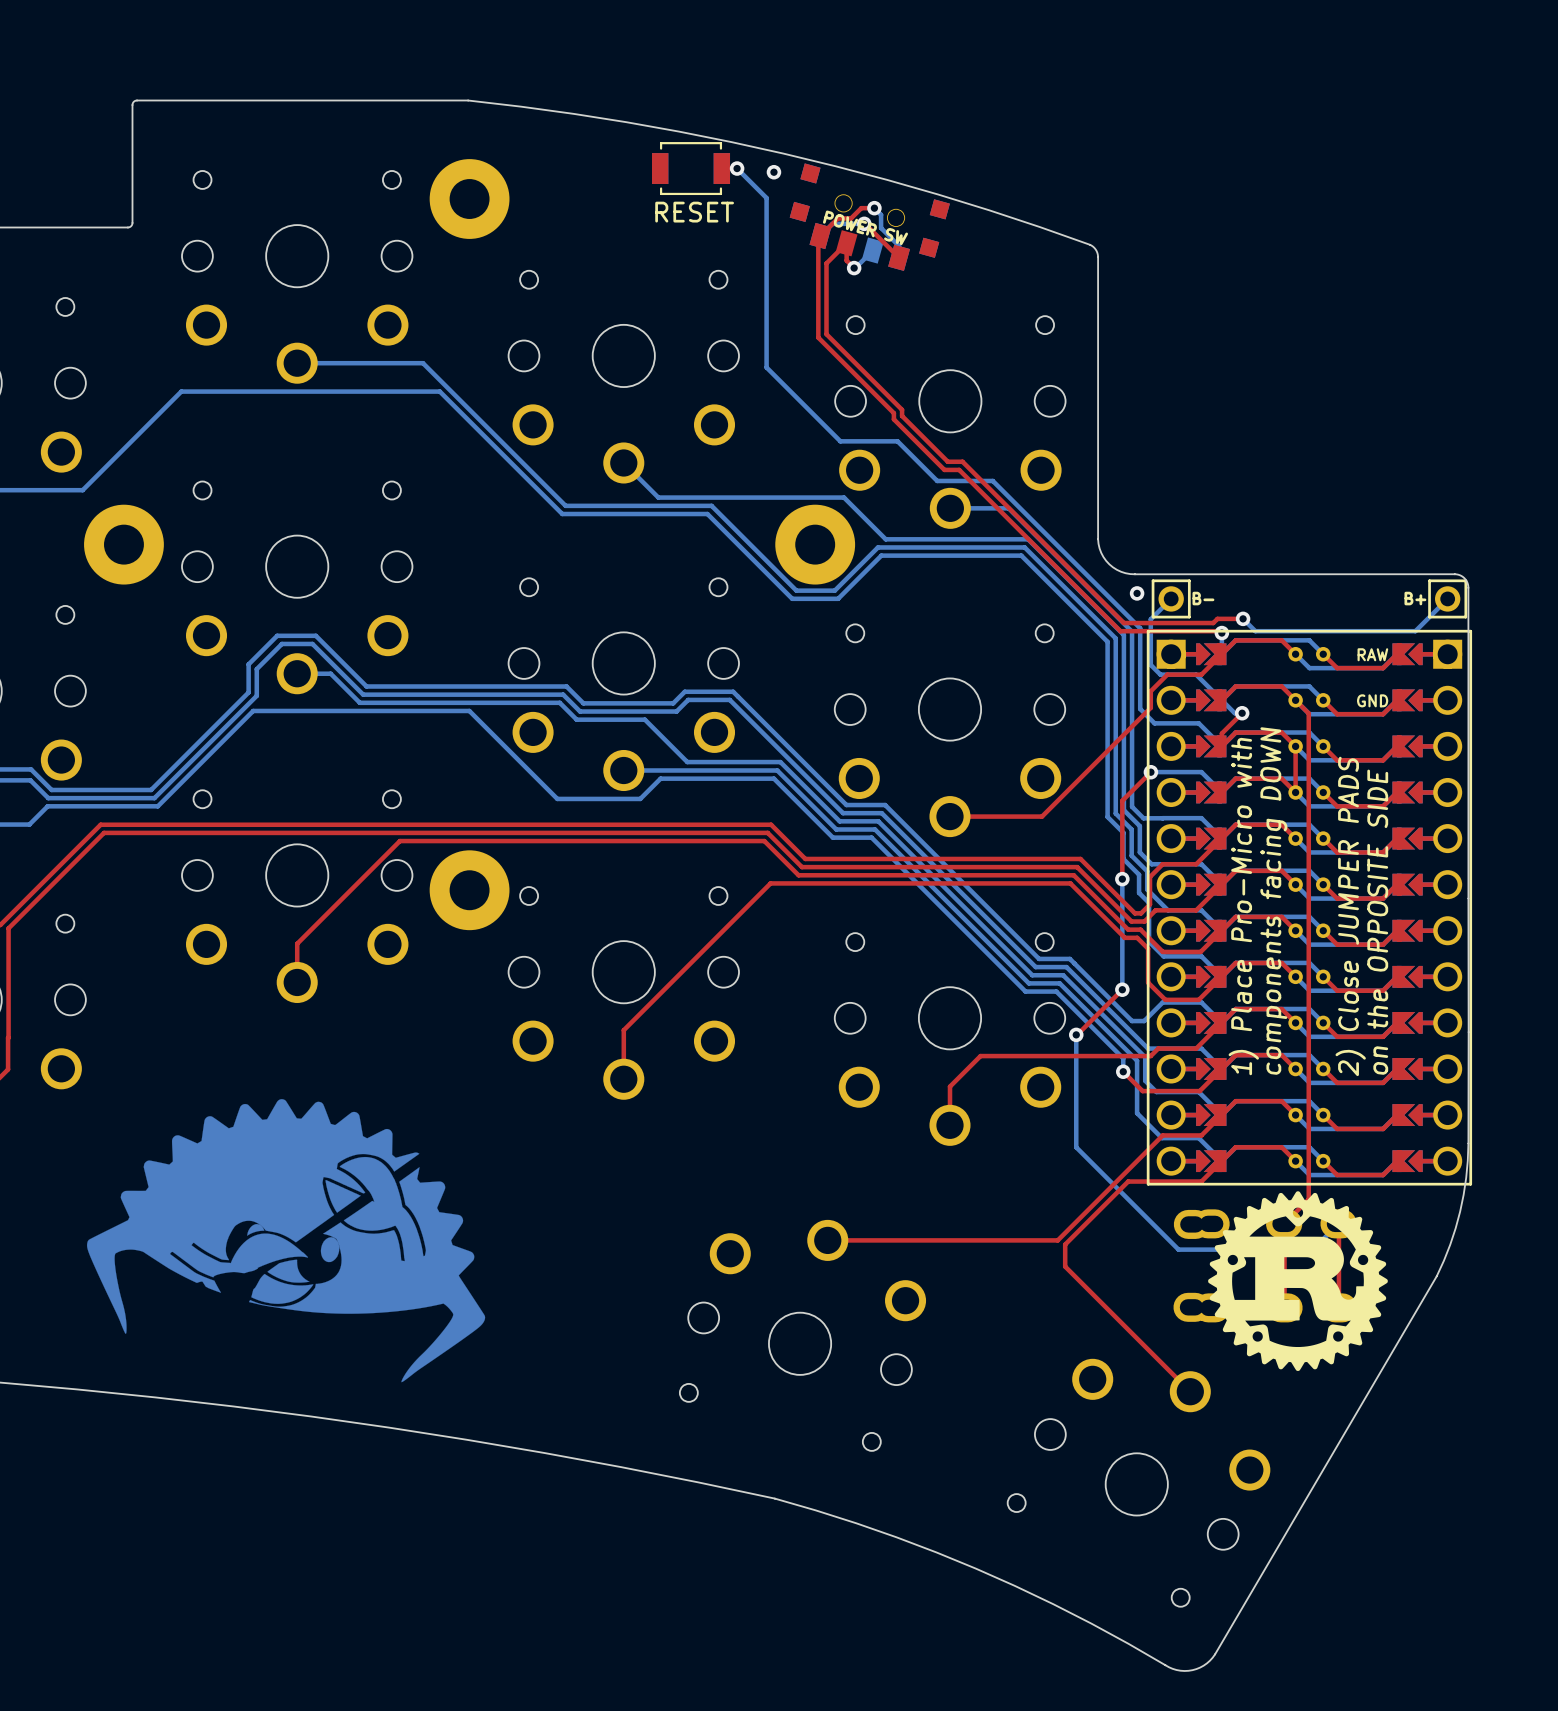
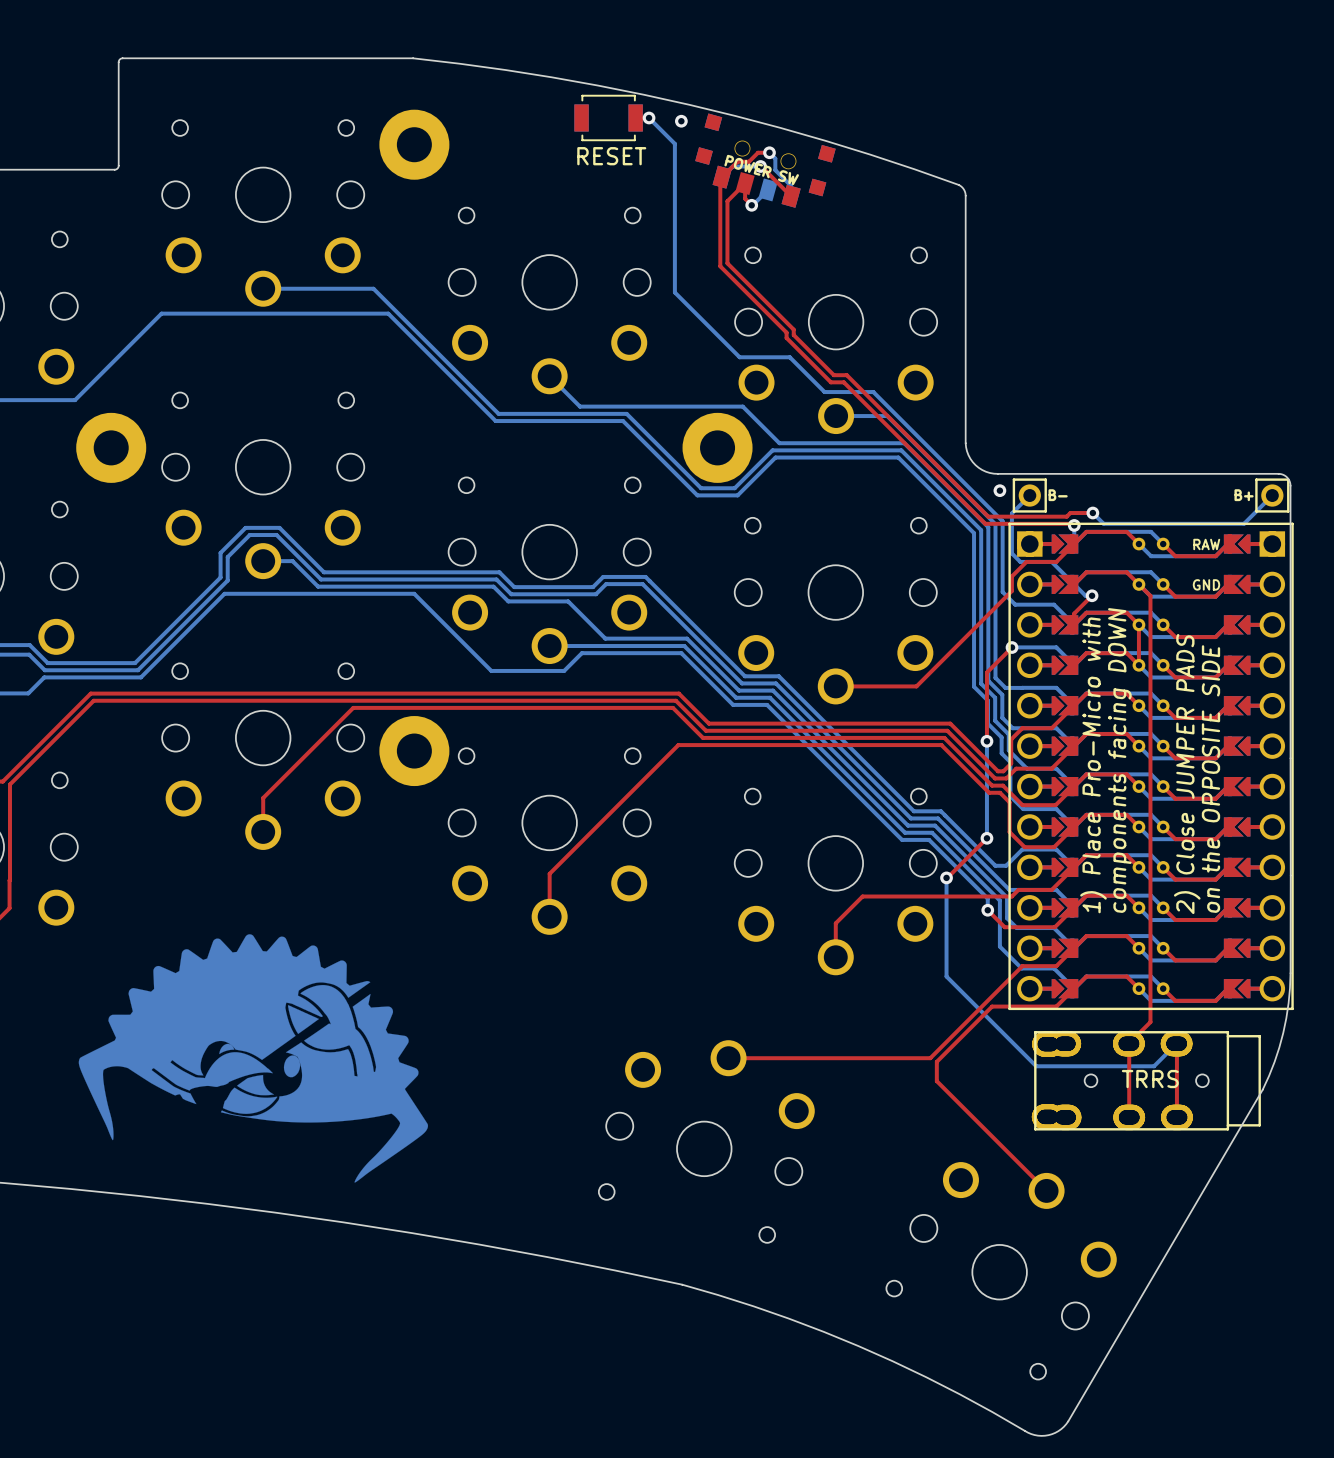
drawing: [1208, 1191, 1388, 1371] -> none
text: none -> TRRS (1150, 1079)
part: none -> (1146, 1080)

